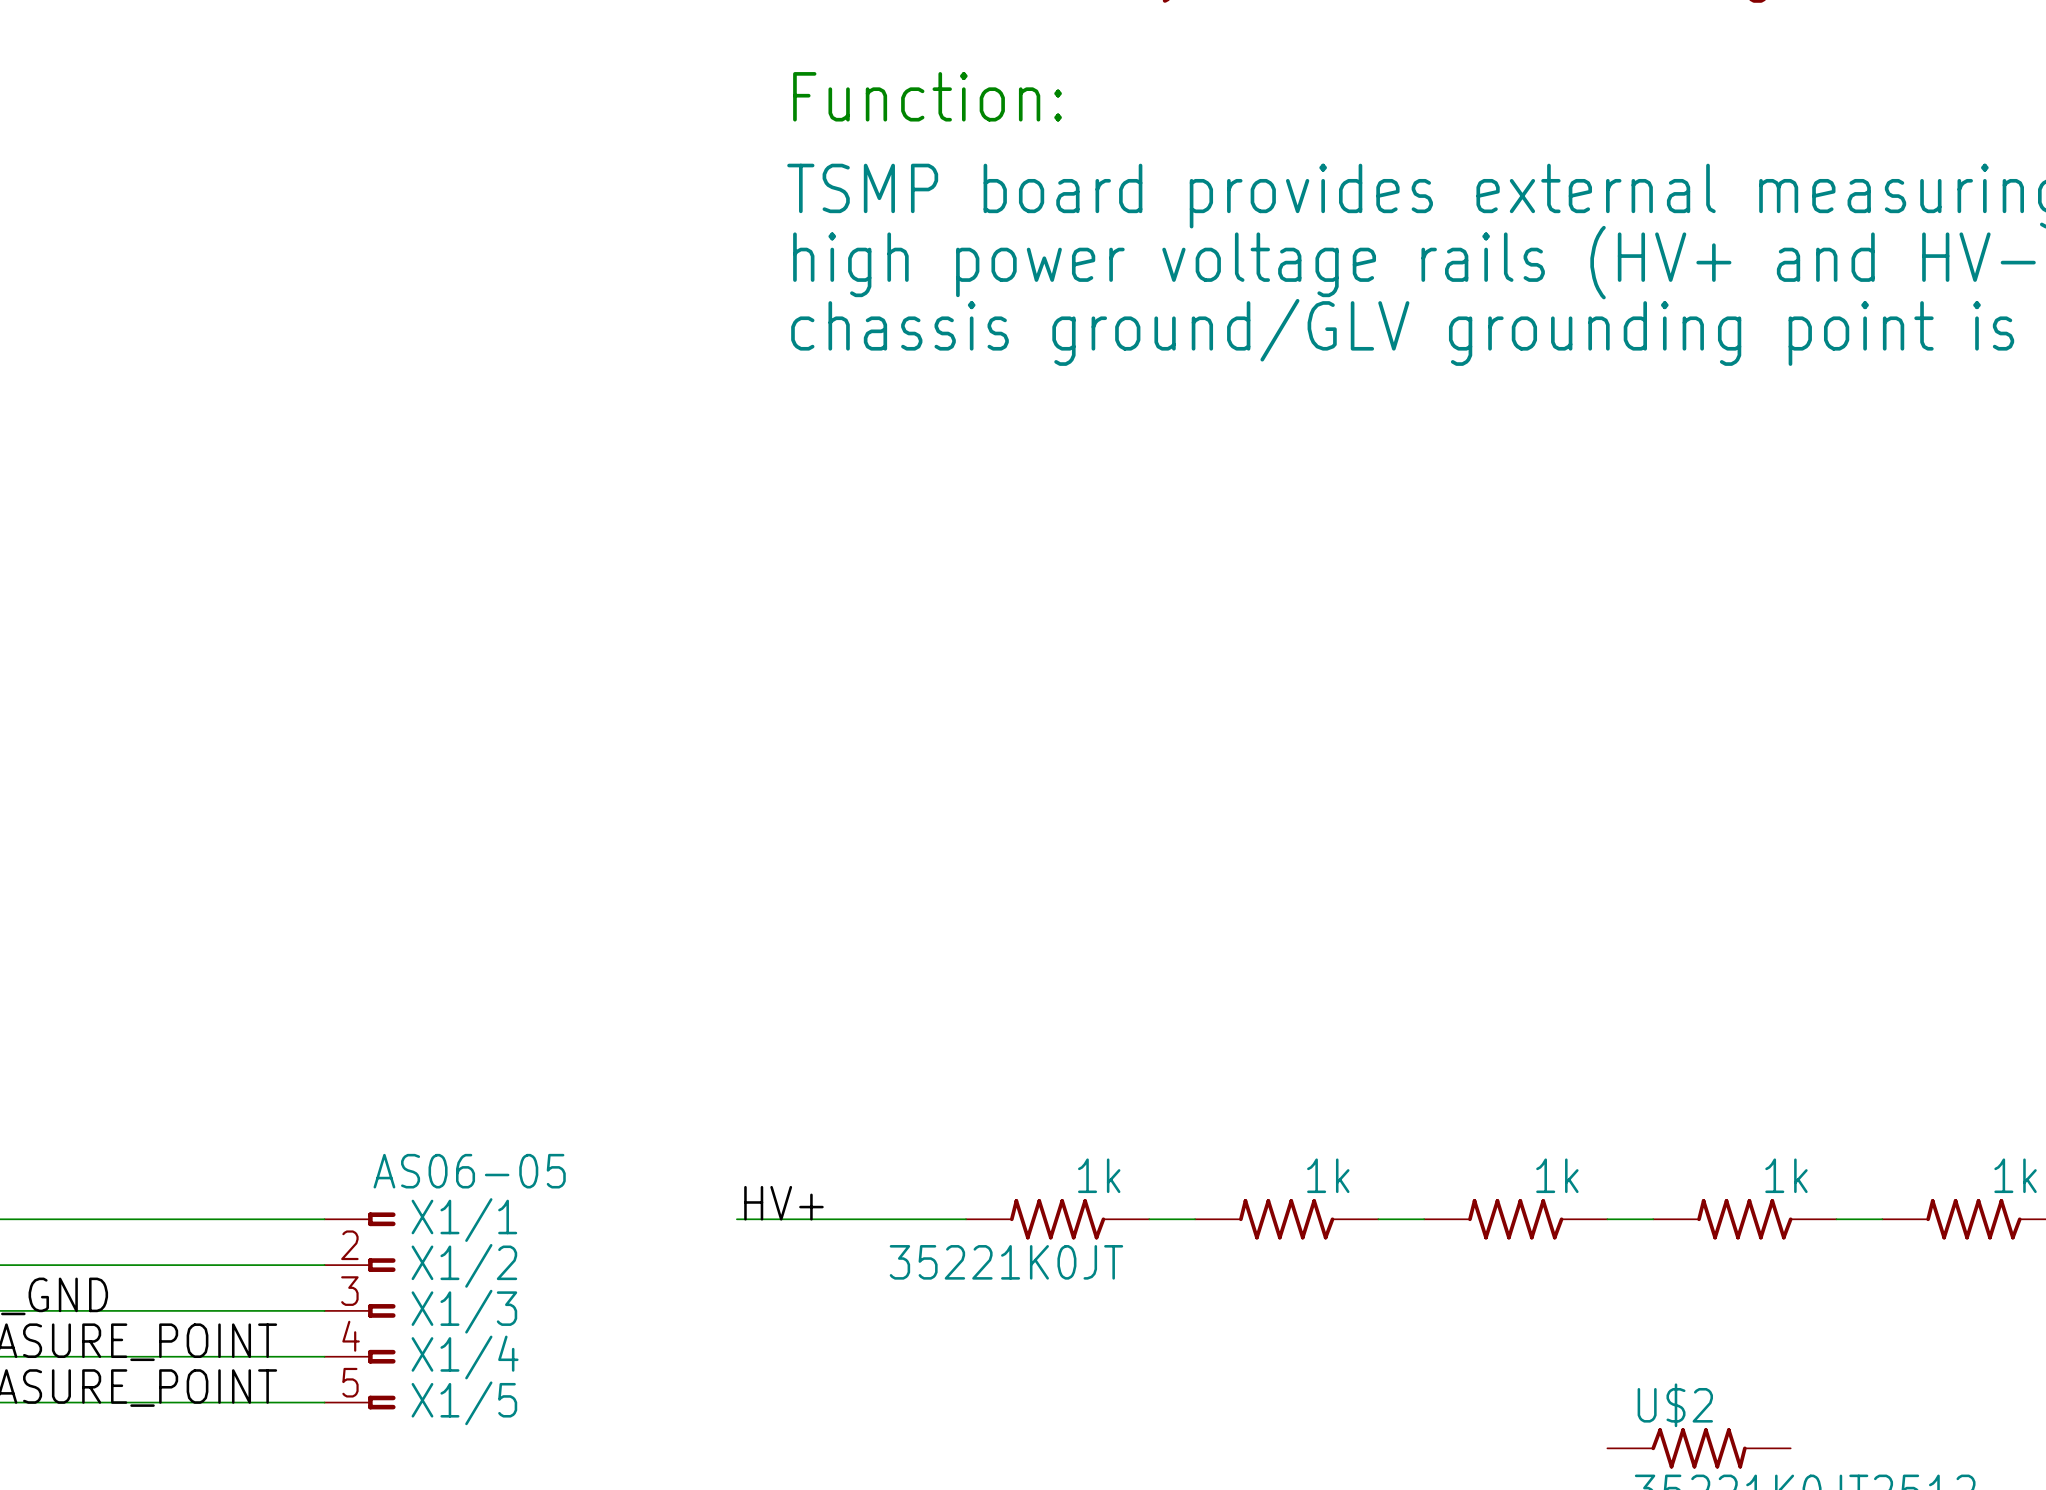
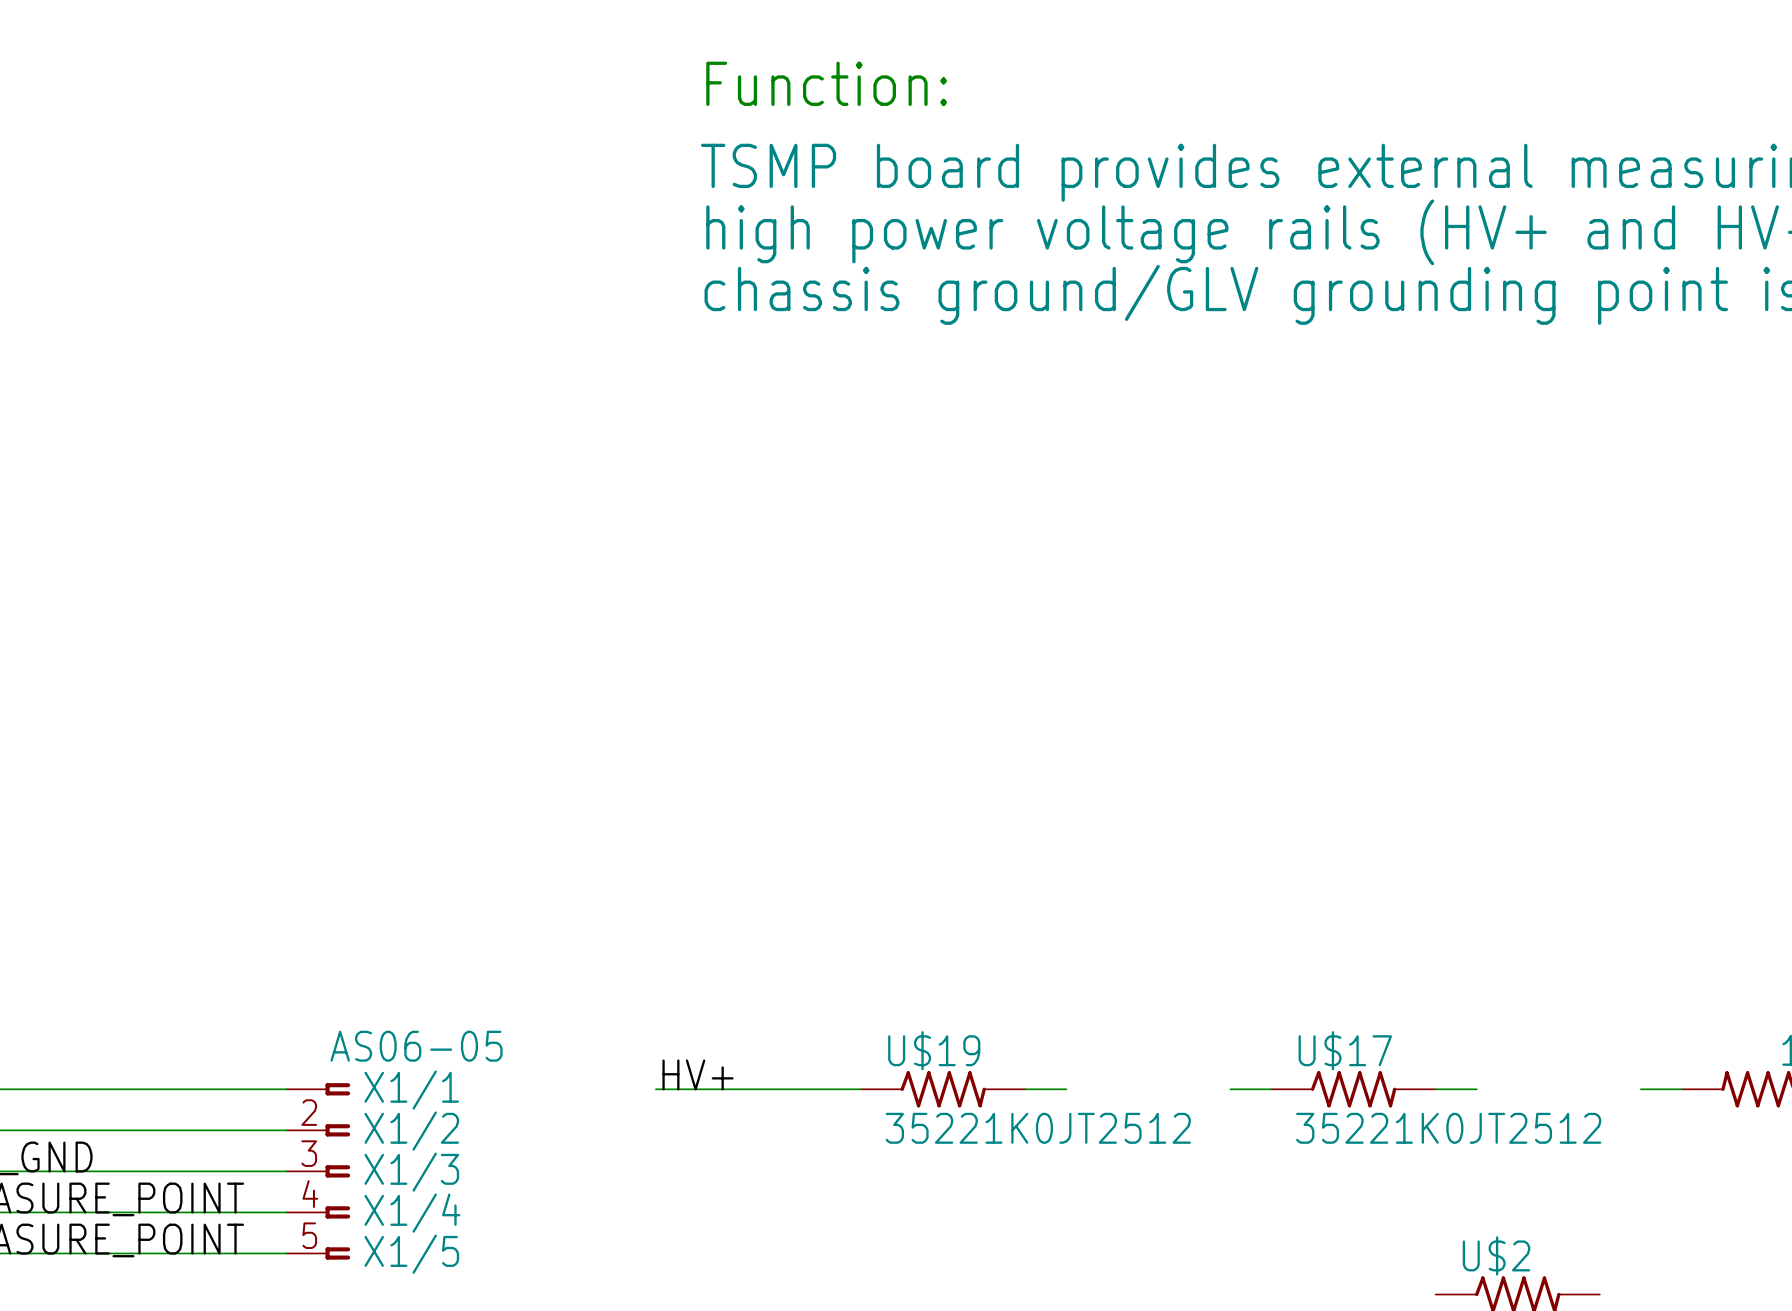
35221K0JT: 1k (1057, 1219) -> none
U$19: none -> 35221K0JT2512 (943, 1089)
part: 1k (1286, 1219) -> none
part: 1k (1515, 1219) -> none
U$17: none -> 35221K0JT2512 (1353, 1089)
part: 1k (1744, 1219) -> none

